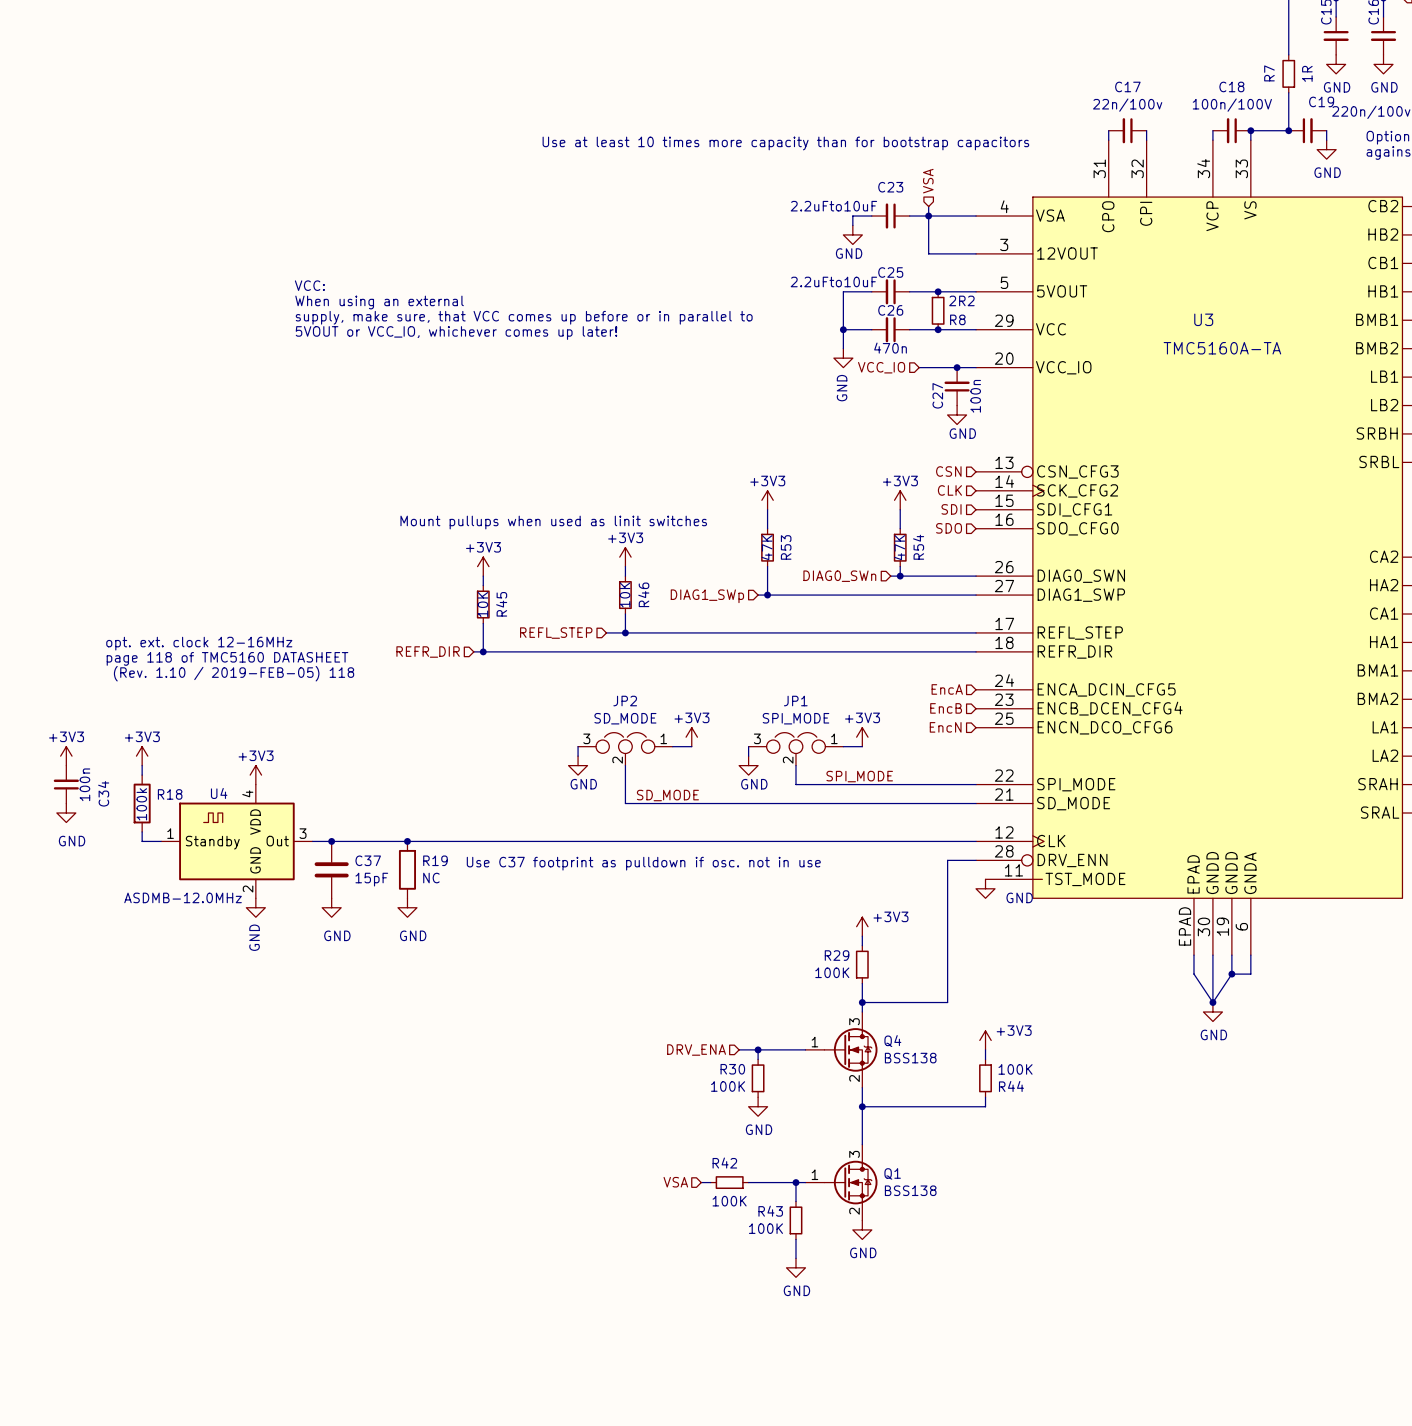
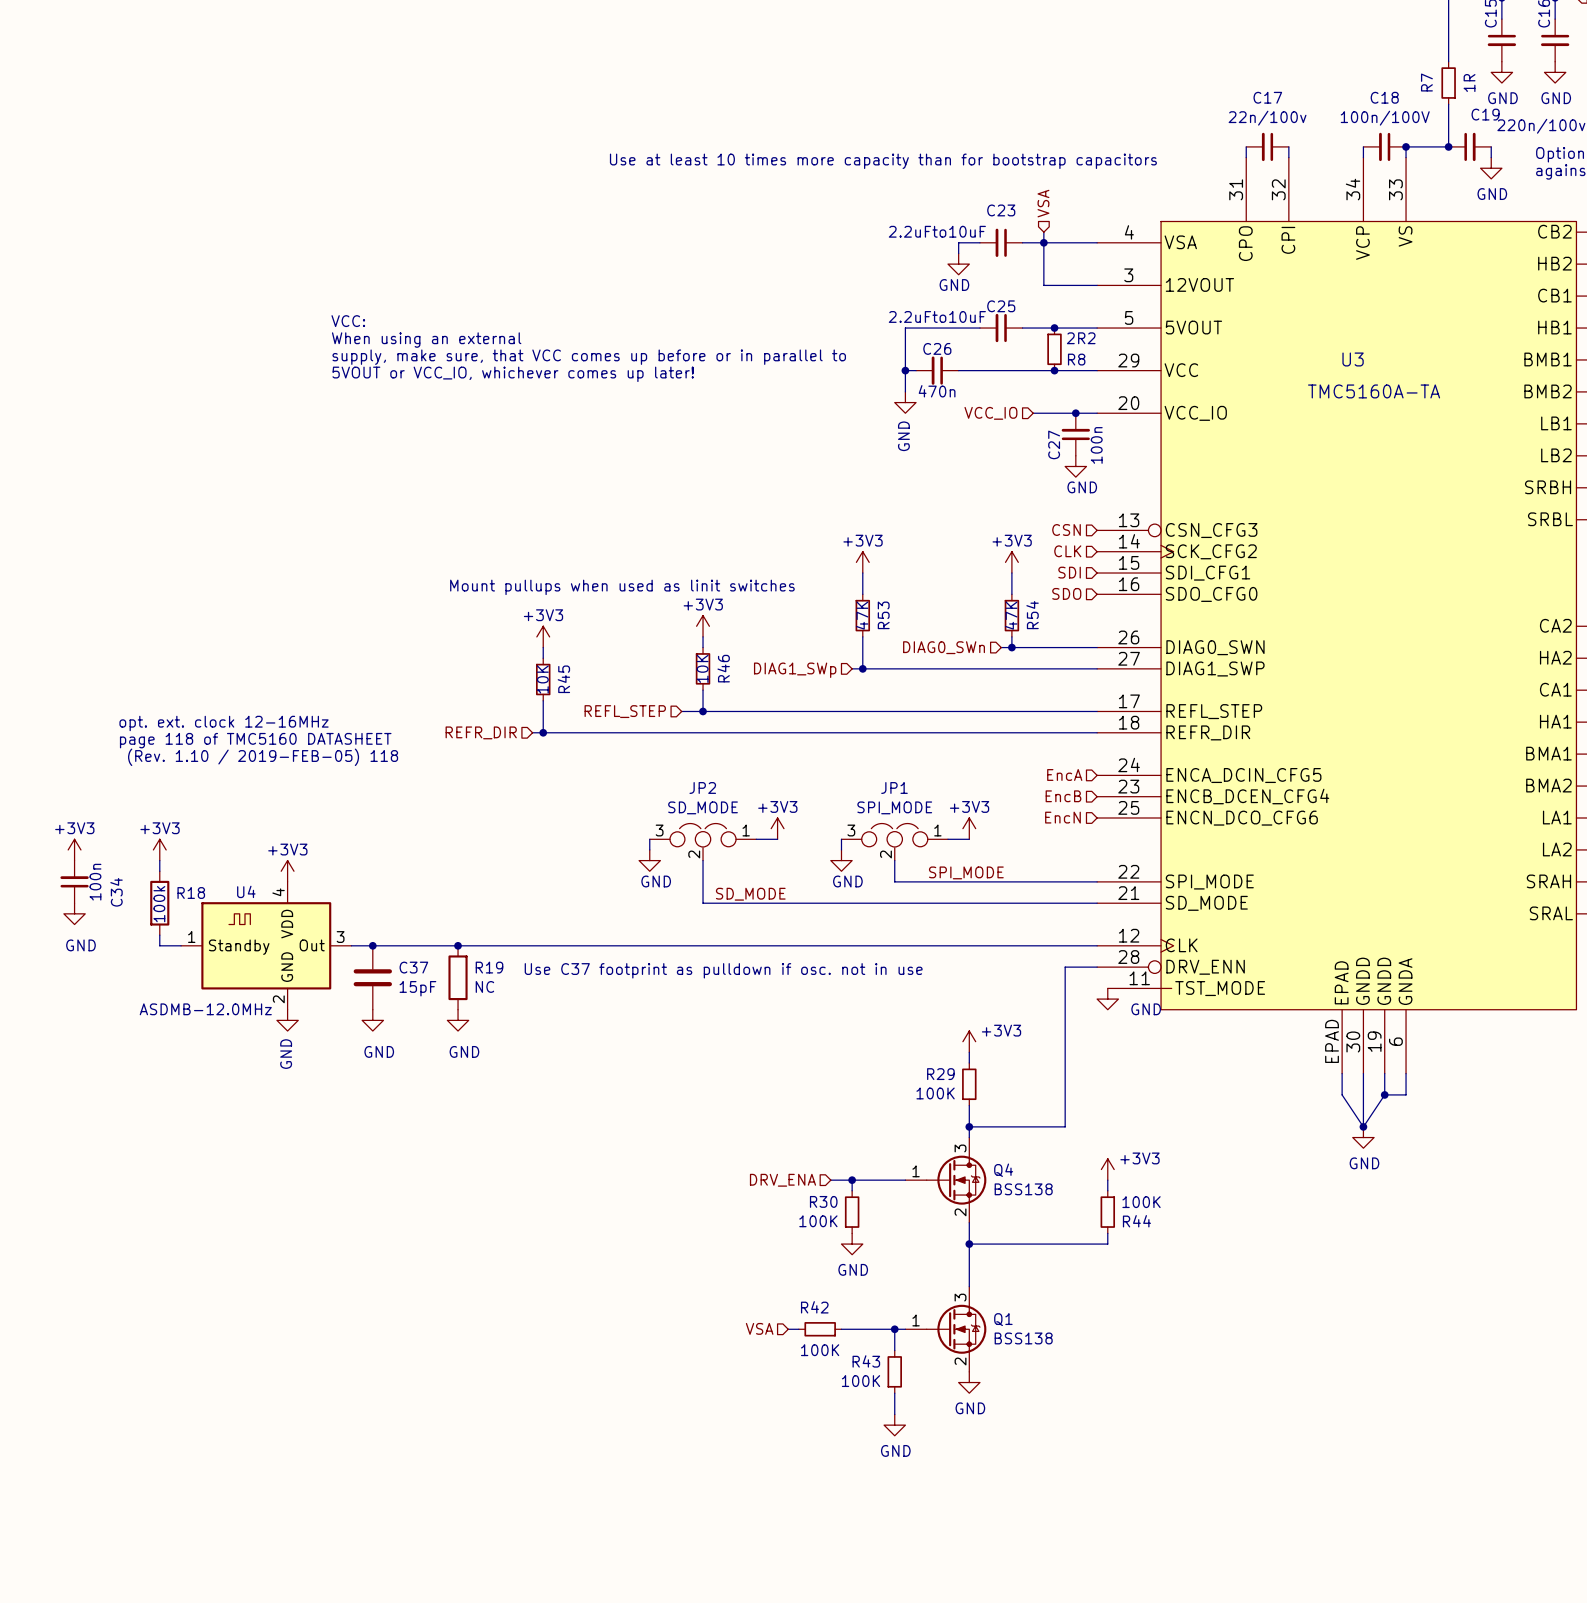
wire: (843, 291) (843, 348) -> (948, 328) (905, 328) (905, 391)
junction position: (843, 329) -> (905, 370)
C26 position: (890, 329) -> (937, 370)
power symbol position: GND (843, 358) -> GND (905, 402)

